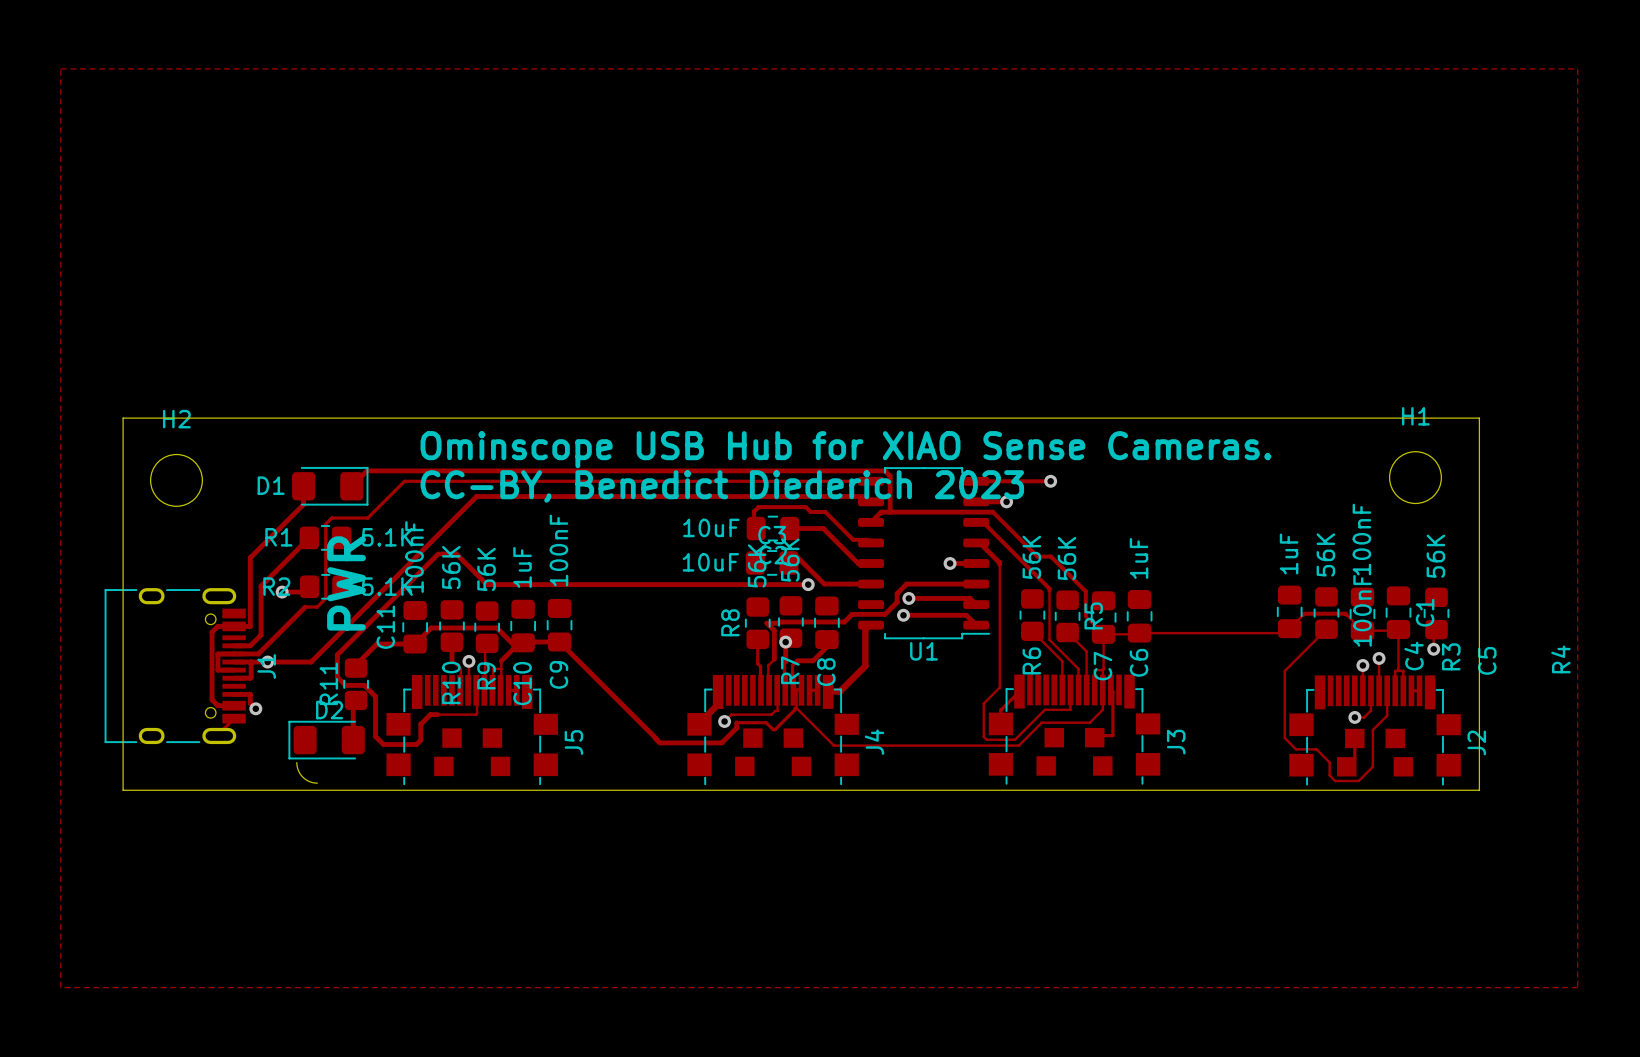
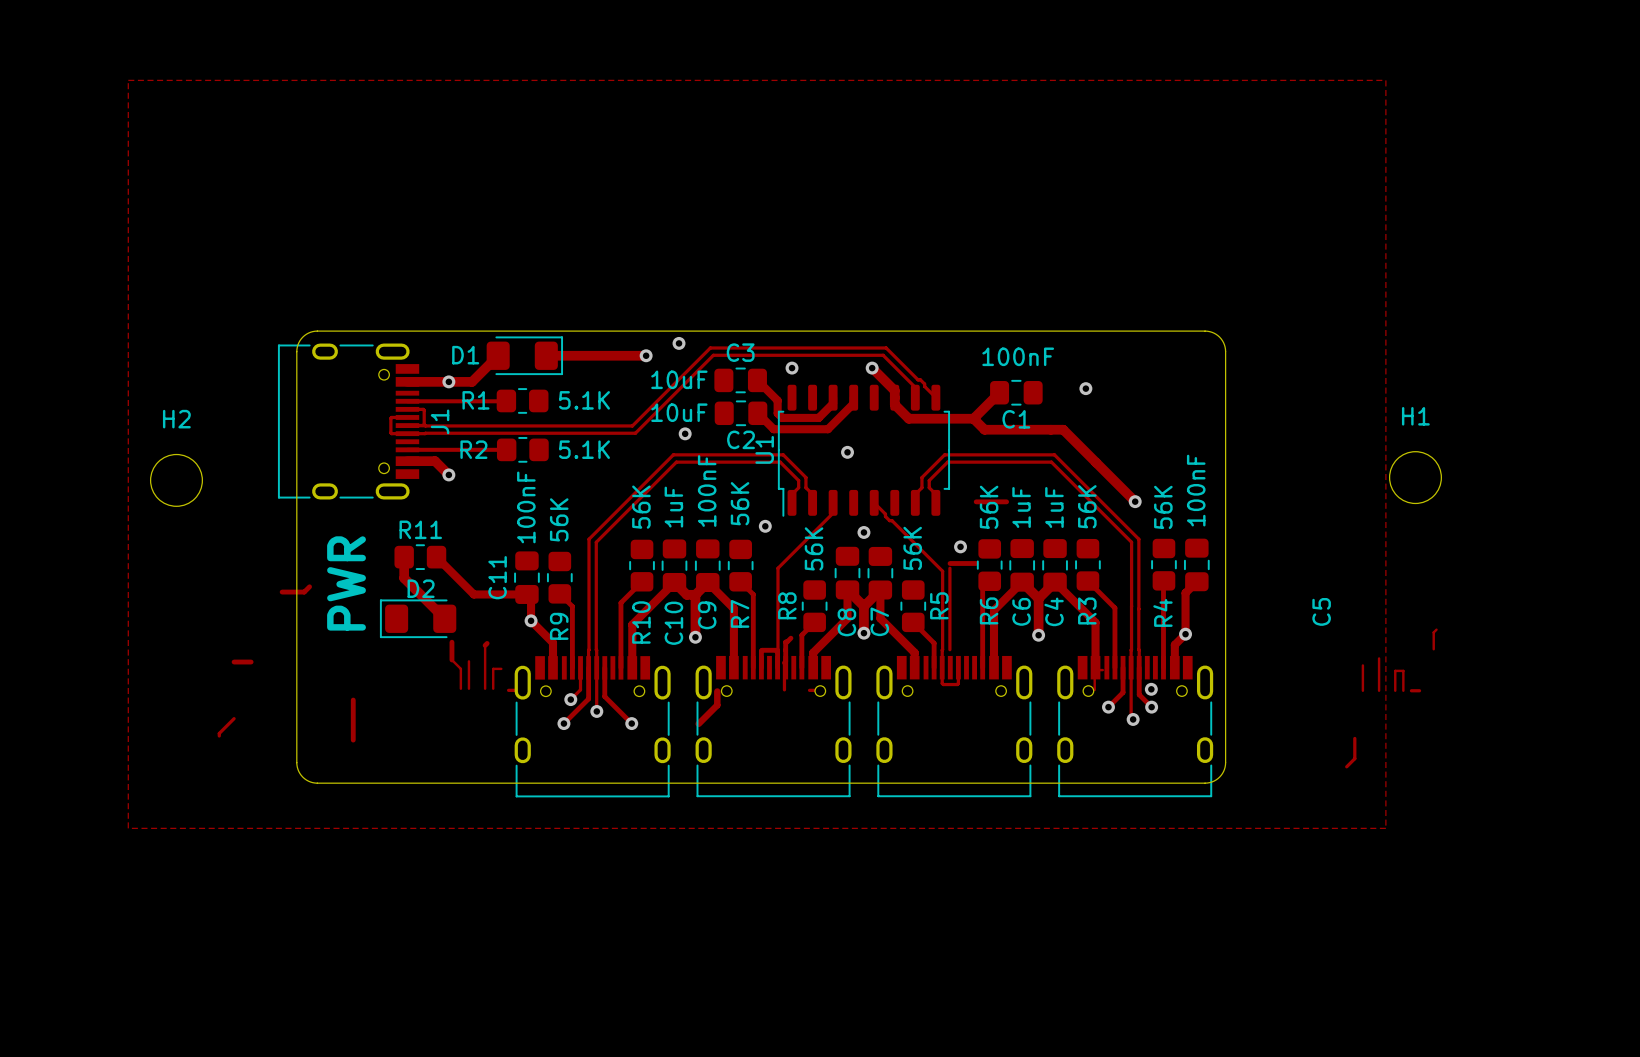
zone outline: (60, 68) (1577, 68) (1577, 987) (60, 987) (60, 68) -> (128, 80) (128, 828) (1385, 828) (1385, 80) (128, 80)
via: none -> (679, 343)
track: none -> (498, 355) (472, 381) (407, 381)
track: none -> (546, 355) (646, 355)
via: none -> (646, 355)
via: none -> (792, 368)
track: none -> (872, 368) (894, 390) (894, 404) (908, 418) (973, 418)
via: none -> (872, 368)
track: none -> (757, 380) (777, 400) (777, 413) (782, 417) (818, 417) (833, 403) (833, 397)
via: none -> (448, 381)
via: none -> (1085, 388)
track: none -> (999, 392) (973, 418)
track: none -> (853, 397) (853, 403) (827, 429) (773, 429) (757, 413)
track: none -> (915, 397) (915, 387) (883, 355) (713, 355) (635, 433) (390, 432) (391, 417) (407, 417)
track: none -> (935, 397) (924, 386) (924, 384) (886, 348) (710, 348) (632, 425) (407, 425)
track: none -> (506, 400) (407, 401)
track: none -> (407, 409) (424, 410) (423, 425)
board edge: (123, 418) (1479, 418) (1479, 790) (123, 790) (123, 418) -> none
track: none -> (973, 418) (984, 429) (1063, 429) (1135, 501)
via: none -> (685, 433)
track: none -> (407, 449) (506, 449)
text: Ominscope USB Hub for XIAO Sense Cameras. (845, 449) -> none
via: none -> (847, 452)
track: none -> (407, 461) (435, 461) (448, 474)
via: none -> (448, 474)
track: (871, 481) (404, 481) (367, 518) (331, 518) (325, 524) (325, 598) (317, 607) (305, 607) (258, 653) (217, 653) (217, 670) (234, 670) -> none
track: (976, 481) (1050, 481) -> none
via: (1050, 481) -> none
track: (303, 486) (303, 504) (250, 557) (250, 626) (217, 626) (212, 632) (212, 699) (217, 705) (234, 705) -> none
D1 position: (330, 486) -> (524, 355)
track: (351, 486) (367, 470) (884, 470) (890, 476) (890, 512) -> none
text: CC-BY, Benedict Diederich 2023 (722, 486) -> none
track: (871, 501) (865, 496) (476, 496) (311, 662) (251, 662) (250, 678) (234, 678) -> none
via: (1006, 501) -> none
via: none -> (1135, 501)
track: none -> (792, 502) (792, 494) (798, 487) (798, 480) (780, 462) (676, 462) (596, 542) (596, 711)
track: none -> (812, 502) (812, 494) (805, 487) (805, 477) (783, 454) (673, 454) (589, 539) (588, 698) (563, 723)
track: none -> (833, 502) (833, 513) (777, 568) (777, 667) (776, 650) (761, 651) (761, 667)
track: none -> (874, 502) (889, 520) (892, 520) (942, 571) (943, 684) (958, 683) (958, 667)
track: none -> (915, 502) (915, 494) (921, 487) (921, 477) (944, 454) (1054, 454) (1138, 539) (1139, 694) (1151, 707)
track: none -> (935, 502) (935, 494) (929, 487) (929, 480) (947, 462) (1051, 462) (1131, 542) (1131, 717) (1133, 719)
track: (871, 522) (881, 512) (992, 512) (1037, 556) (1050, 556) (1085, 591) (1085, 616) (1103, 634) -> none
track: (976, 522) (983, 522) (1049, 588) (1049, 639) (1078, 668) (1078, 689) -> none
via: none -> (765, 526)
track: (756, 528) (754, 526) (754, 511) (758, 507) (805, 507) (810, 511) (825, 511) (853, 539) (867, 539) (871, 542) -> none
C2 position: (772, 528) -> (741, 413)
track: (789, 528) (823, 528) (858, 563) (871, 563) -> none
via: none -> (863, 532)
track: (309, 537) (261, 586) (261, 635) (250, 645) (234, 645) -> none
R1 position: (325, 537) -> (522, 400)
track: (976, 542) (979, 542) (999, 562) (999, 687) (983, 703) (983, 736) (986, 739) (1015, 739) (1044, 709) (1070, 709) (1070, 689) -> none
track: (438, 553) (337, 654) (337, 677) (345, 685) (364, 685) (375, 696) (375, 736) (383, 744) (416, 744) (420, 740) (420, 724) (430, 714) (437, 714) -> none
U1 rotation: 0° (924, 553) -> 90° clockwise (863, 450)
U1 position: (924, 553) -> (863, 450)
track: (441, 554) (456, 554) (486, 584) (808, 584) -> none
track: (788, 554) (794, 554) (824, 584) (871, 584) -> none
track: none -> (404, 557) (404, 578) (444, 618)
track: none -> (436, 557) (473, 594) (526, 594) (531, 598) (531, 620) (553, 642) (553, 667)
C3 position: (772, 562) -> (740, 380)
via position: (950, 563) -> (960, 546)
track: none -> (949, 568) (949, 649)
track: none -> (1163, 580) (1163, 667)
track: none -> (642, 581) (620, 602) (620, 667)
track: none -> (740, 581) (753, 594) (753, 667)
track: none -> (989, 581) (982, 588) (982, 667)
track: none -> (1087, 581) (1114, 608) (1114, 667)
track: none -> (1196, 581) (1185, 593) (1185, 634) (1174, 644) (1174, 667)
via: (808, 584) -> none
track: (976, 584) (906, 584) (897, 593) (897, 602) (885, 614) (852, 614) (844, 622) (766, 623) (774, 630) (774, 659) (768, 665) (768, 689) -> none
R2 position: (325, 586) -> (522, 449)
via: (282, 592) -> none
track: none -> (559, 593) (572, 606) (572, 667)
track: none -> (695, 594) (707, 582) (733, 608) (733, 667)
track: none -> (695, 594) (695, 637)
track: none -> (695, 594) (686, 594) (674, 582) (632, 624) (632, 667)
track: (908, 598) (970, 598) (976, 604) -> none
via: (908, 598) -> none
track: none -> (1038, 598) (1022, 582) (993, 610) (993, 667)
track: none -> (1038, 598) (1038, 635)
track: none -> (1038, 598) (1055, 582) (1095, 622) (1095, 667)
track: none -> (863, 606) (880, 590) (880, 618) (914, 652) (914, 667)
C4 position: (1289, 611) -> (1055, 565)
C1 rotation: 0° (1398, 612) -> 90° clockwise (1016, 392)
C1 position: (1398, 612) -> (1016, 392)
R3 position: (1326, 613) -> (1087, 564)
C5 position: (1362, 613) -> (1196, 564)
R4 position: (1436, 613) -> (1163, 564)
track: (903, 615) (966, 615) (976, 625) -> none
via: (903, 615) -> none
R6 position: (1032, 615) -> (989, 565)
R5 position: (1067, 616) -> (913, 606)
C6 position: (1139, 616) -> (1022, 565)
C7 position: (1103, 617) -> (880, 573)
via: none -> (531, 620)
R7 position: (790, 621) -> (740, 565)
track: none -> (814, 622) (801, 635) (801, 667)
C8 position: (826, 622) -> (847, 573)
track: none -> (913, 622) (934, 643) (934, 667)
R8 position: (757, 623) -> (814, 606)
C9 position: (559, 625) -> (707, 565)
track: (871, 625) (865, 630) (865, 666) (839, 691) (827, 691) -> none
R10 position: (451, 626) -> (642, 565)
C10 position: (523, 626) -> (674, 565)
C11 position: (415, 627) -> (526, 577)
R9 position: (487, 627) -> (559, 577)
track: (1326, 629) (1284, 670) (1284, 738) (1296, 749) (1316, 749) (1329, 762) (1329, 775) (1335, 780) (1358, 780) (1372, 766) (1372, 729) (1387, 715) (1387, 690) -> none
track: (1398, 629) (1398, 670) -> none
track: (1398, 630) (1362, 630) (1345, 613) (1304, 613) (1285, 633) (1103, 634) -> none
track: (1032, 631) (1062, 661) (1062, 689) -> none
track: (1067, 632) (1086, 651) (1086, 689) -> none
track: none -> (863, 633) (863, 606) (847, 589) (847, 618) (813, 652) (813, 667)
via: none -> (863, 633)
track: (1103, 634) (1102, 709) (1089, 722) (1041, 722) (1018, 745) (833, 745) (796, 708) -> none
via: none -> (1185, 634)
via: none -> (1038, 635)
via: none -> (695, 637)
track: (757, 639) (757, 663) (760, 666) (760, 689) -> none
track: (826, 639) (826, 647) (813, 660) (797, 660) (792, 665) (792, 689) (800, 689) -> none
via: (785, 642) -> none
track: (515, 646) (501, 661) (501, 688) -> none
track: (515, 646) (523, 642) (559, 642) (659, 742) (721, 742) (736, 727) (736, 722) (766, 722) (775, 729) (796, 708) -> none
track: (515, 646) (496, 627) (431, 627) (415, 644) (376, 644) (353, 667) -> none
via: (1433, 649) -> none
C4 name position: C4 (1414, 656) -> C4 (1054, 611)
R3 name position: R3 (1451, 656) -> R3 (1087, 610)
via: (1379, 658) -> none
R4 name position: R4 (1560, 659) -> R4 (1162, 612)
via: (468, 661) -> none
via: (267, 662) -> none
via: (1362, 665) -> none
J1 position: (175, 666) -> (348, 421)
track: none -> (580, 667) (580, 689) (570, 699)
track: none -> (604, 667) (604, 696) (631, 723)
track: none -> (1123, 667) (1123, 692) (1108, 707)
R11 rotation: 0° (356, 684) -> 90° clockwise (420, 557)
R11 position: (356, 684) -> (420, 557)
track: (477, 688) (476, 714) (436, 714) -> none
track: (796, 689) (796, 708) -> none
track: (1110, 689) (1112, 691) (1112, 735) (1096, 735) (1094, 737) -> none
via: none -> (1151, 689)
track: (777, 690) (777, 710) (771, 714) (731, 714) (724, 721) -> none
track: (1370, 690) (1370, 710) (1364, 717) (1354, 717) -> none
track: (1019, 691) (1000, 710) (1000, 723) -> none
track: (234, 694) (250, 694) (250, 703) (255, 708) -> none
via: none -> (570, 699)
via: none -> (1108, 707)
via: none -> (1151, 707)
via: (255, 708) -> none
via: none -> (596, 711)
via: (1354, 717) -> none
via: none -> (1133, 719)
via: (724, 721) -> none
via: none -> (563, 723)
via: none -> (631, 723)
part: none -> (592, 726)
part: none -> (773, 726)
part: none -> (954, 726)
part: none -> (1135, 726)
J3: (1074, 729) -> none
J5: (472, 730) -> none
J4: (773, 730) -> none
J2: (1375, 730) -> none
D2 position: (326, 740) -> (418, 618)
board edge: none -> (296, 762) (296, 351) (299, 340) (308, 333) (317, 331) (1205, 331) (1215, 334) (1223, 342) (1225, 351) (1225, 762) (1222, 773) (1213, 781) (1205, 783) (317, 783)

